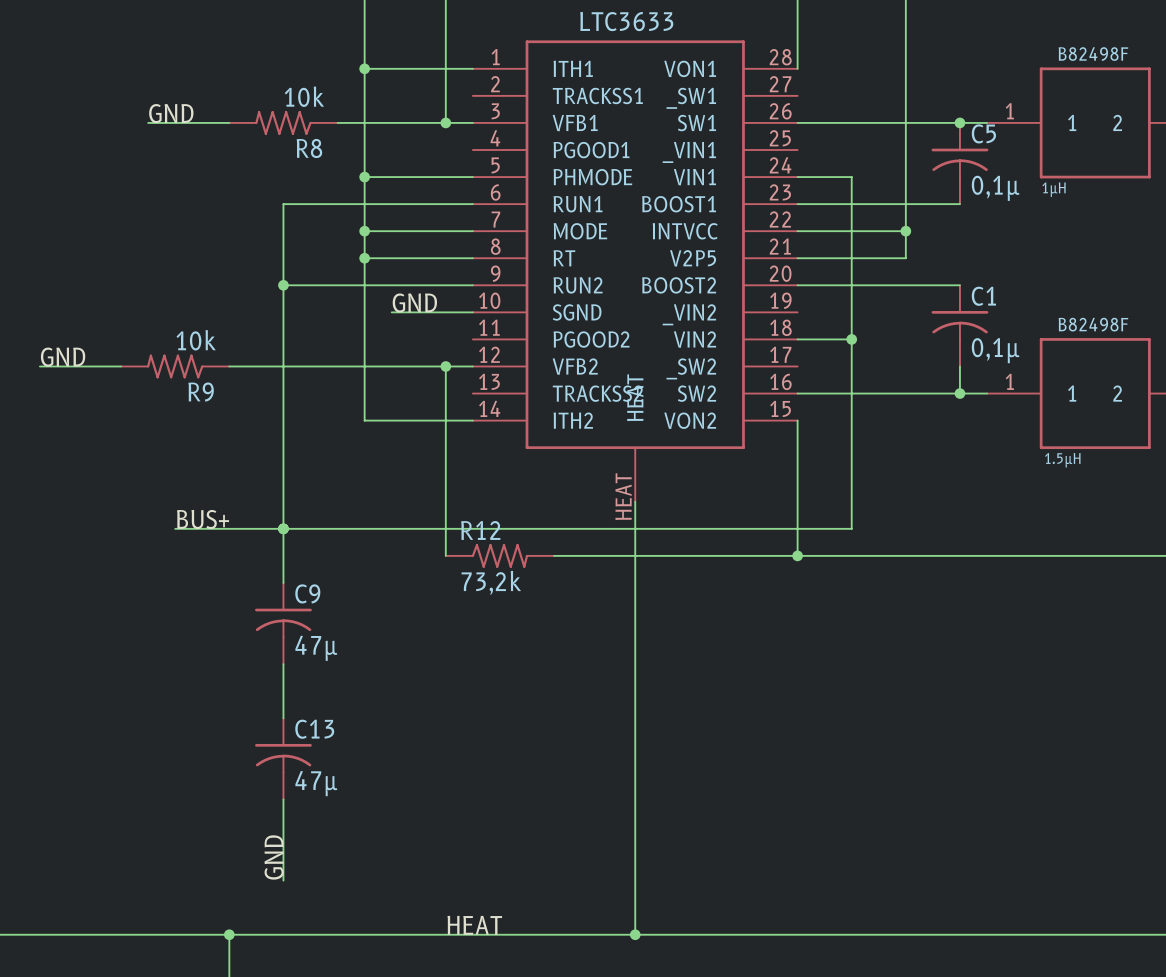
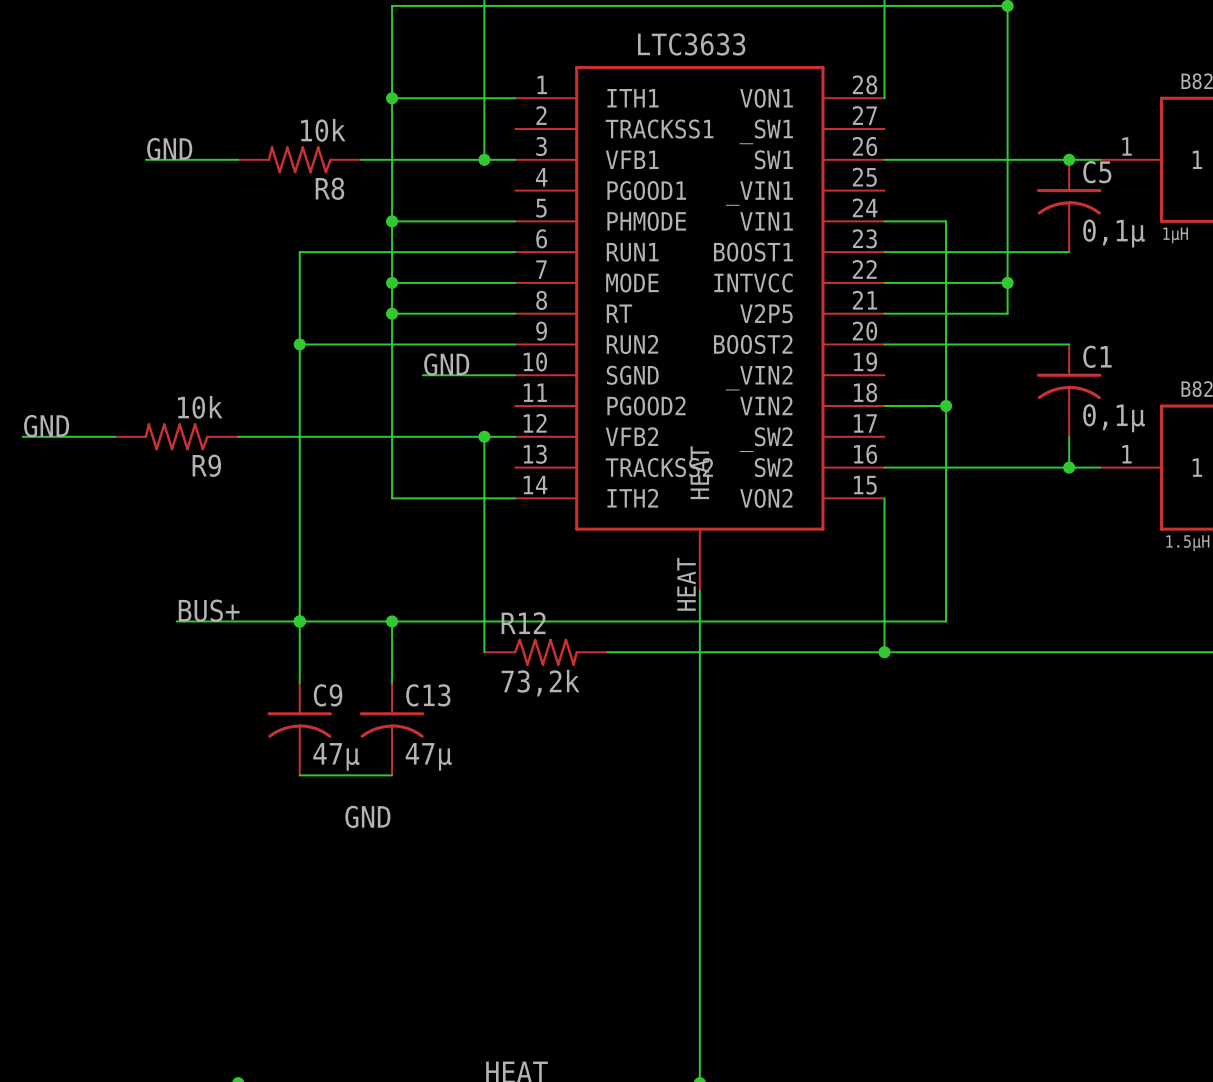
wire: none -> (392, 621) (392, 683)
junction: none -> (392, 621)
wire: (283, 664) (283, 718) -> (299, 775) (392, 775)
C13 position: (283, 758) -> (392, 729)
wire: (283, 799) (283, 880) -> none
label rotation: 0° (274, 857) -> 90° clockwise (367, 816)
label position: GND (274, 857) -> GND (367, 816)

